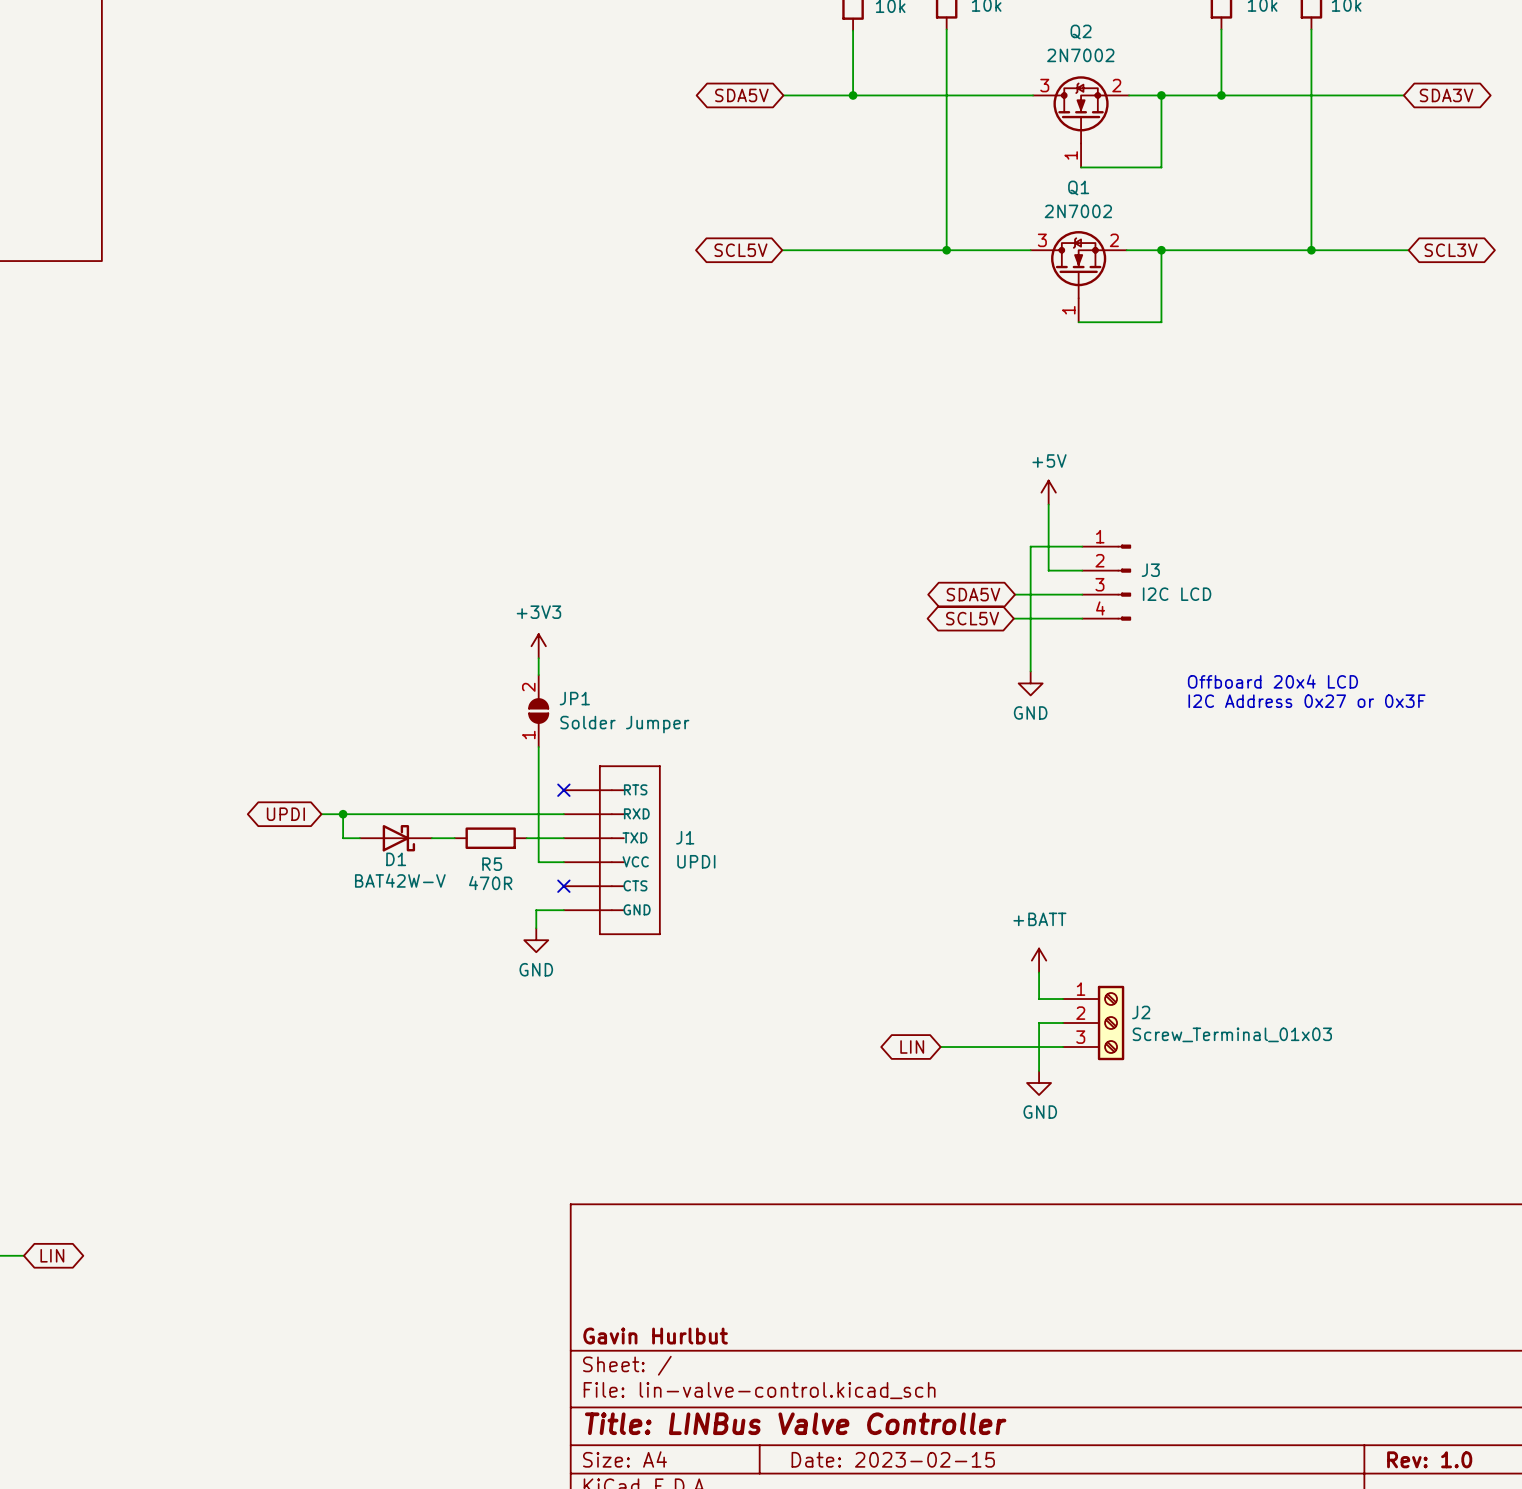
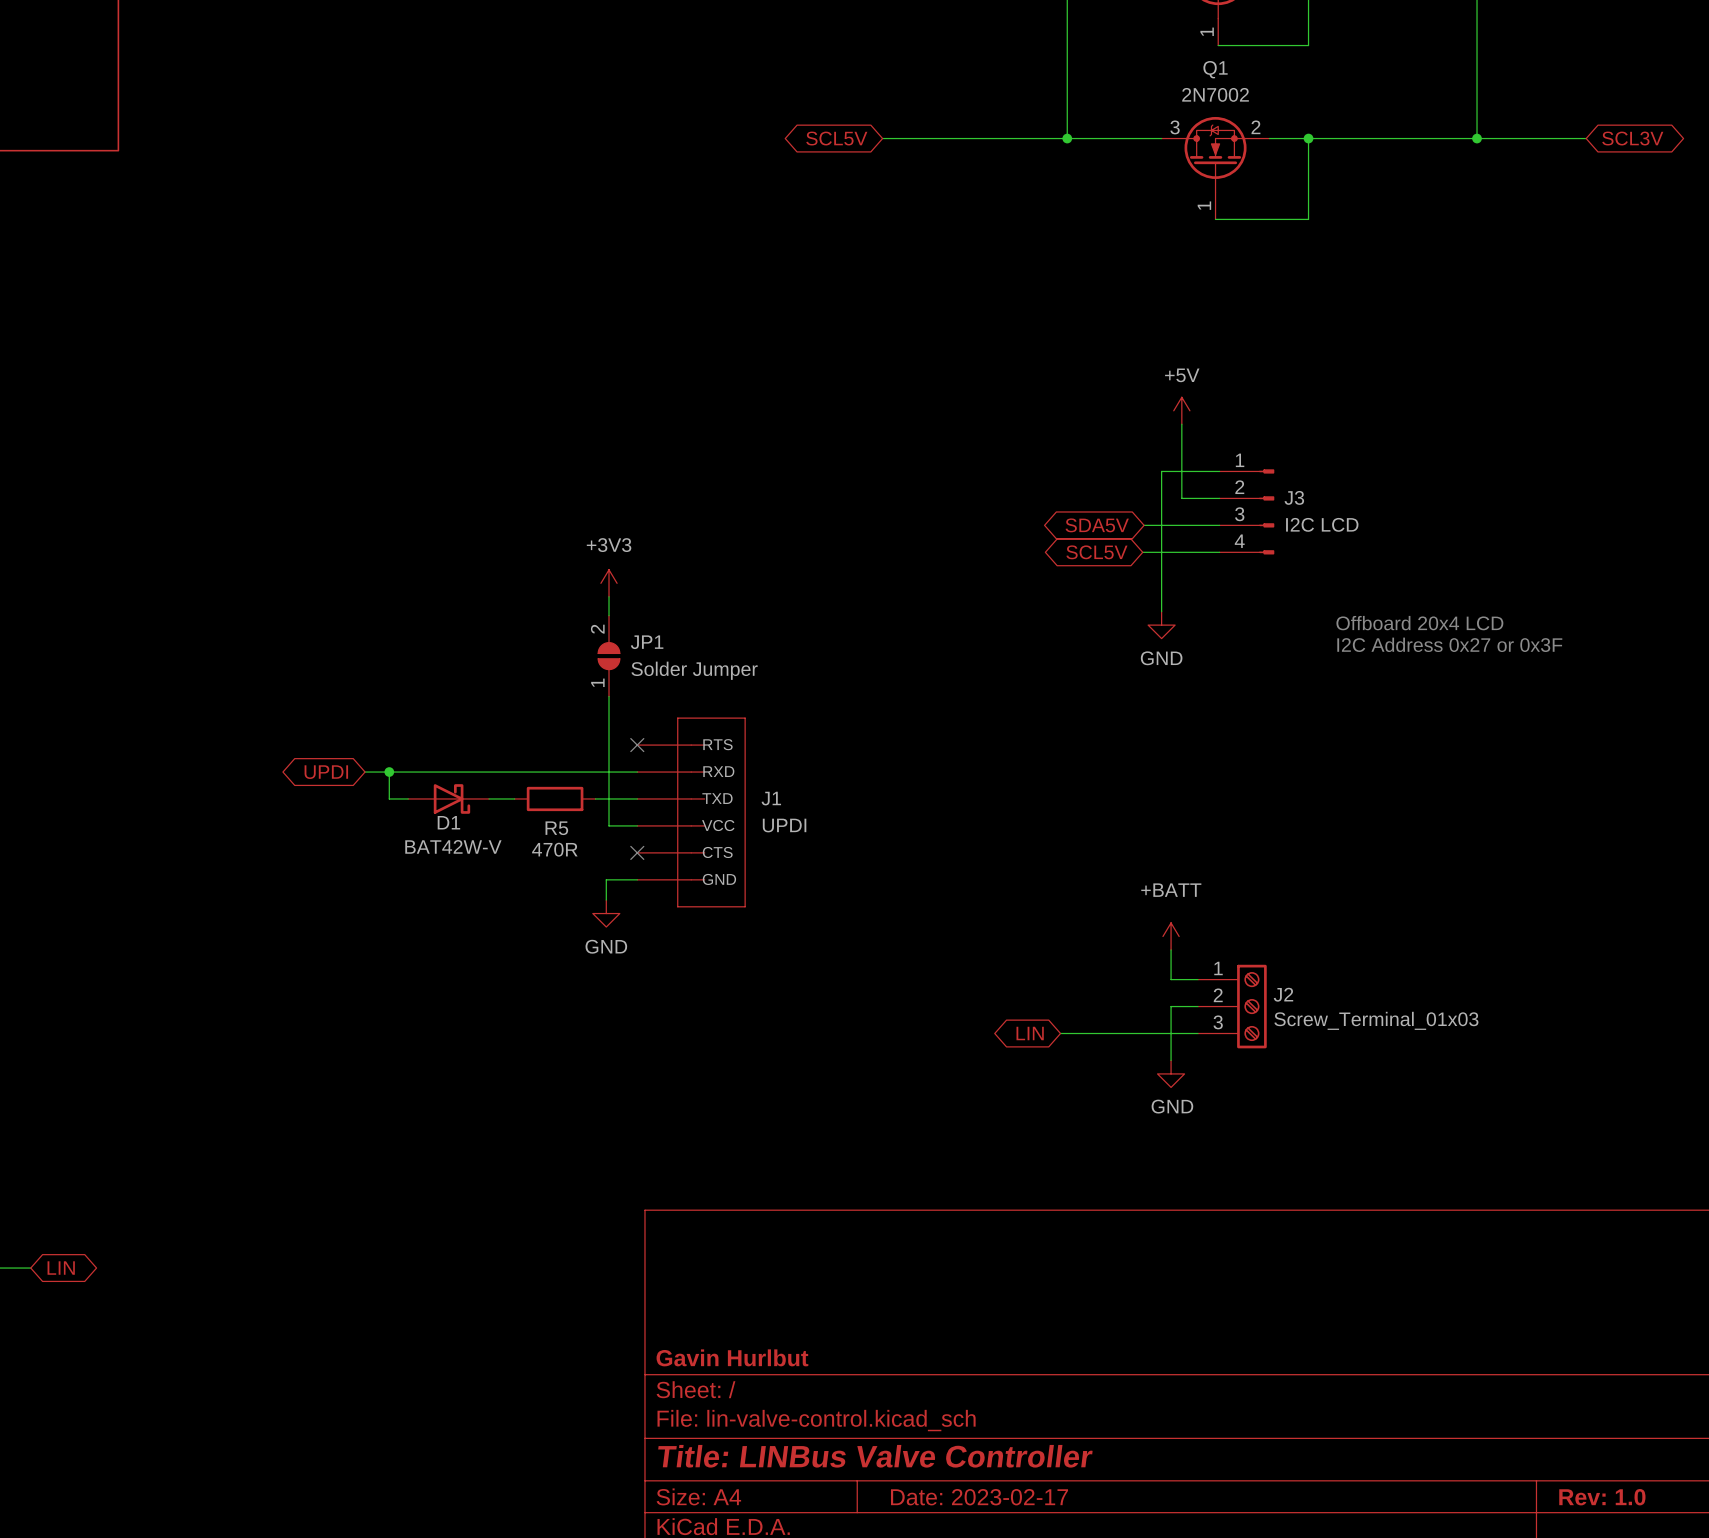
title block: Date: 2023-02-15 (893, 1459) -> Date: 2023-02-17 (979, 1497)

